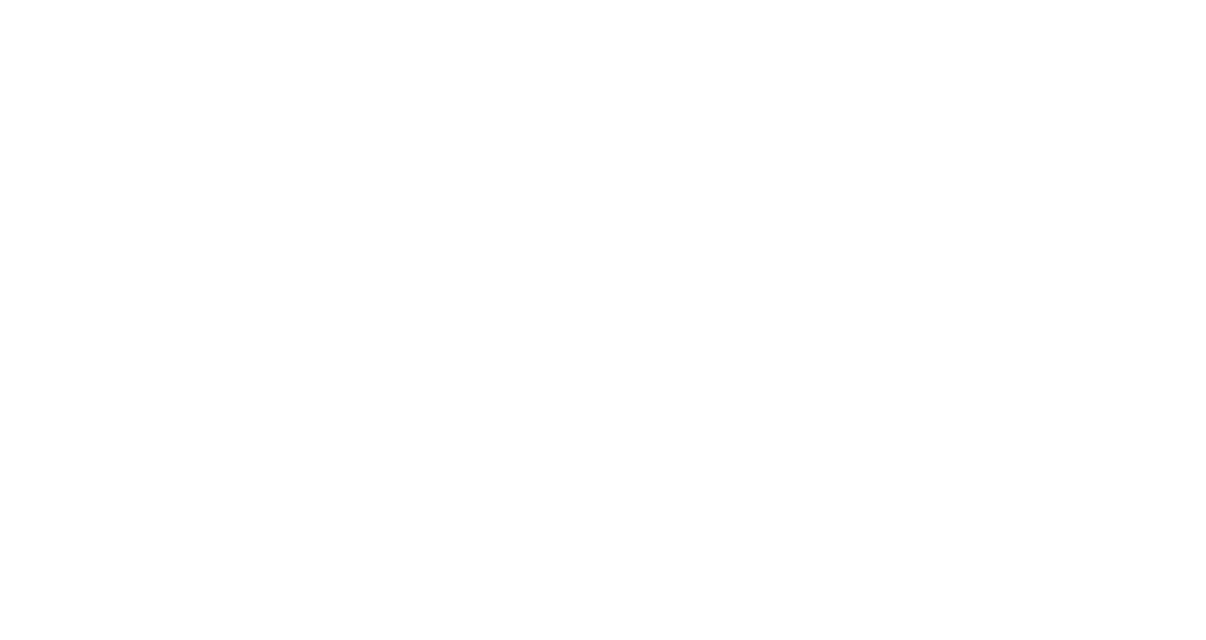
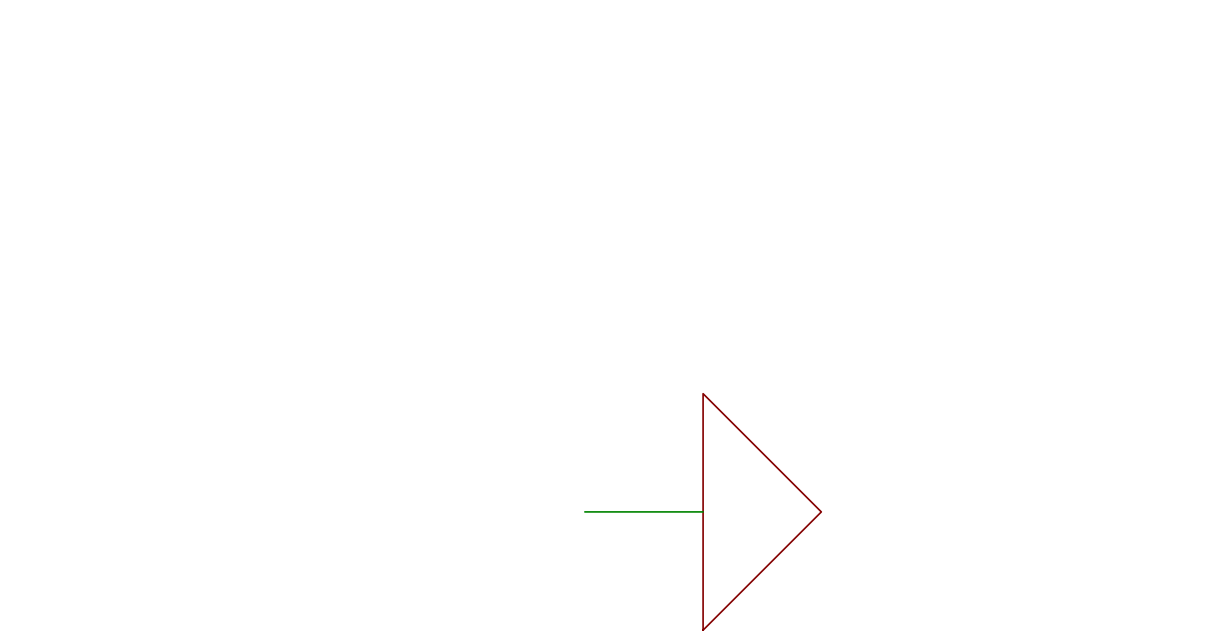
wire: none -> (584, 511) (703, 511)
power symbol: none -> (762, 511)

